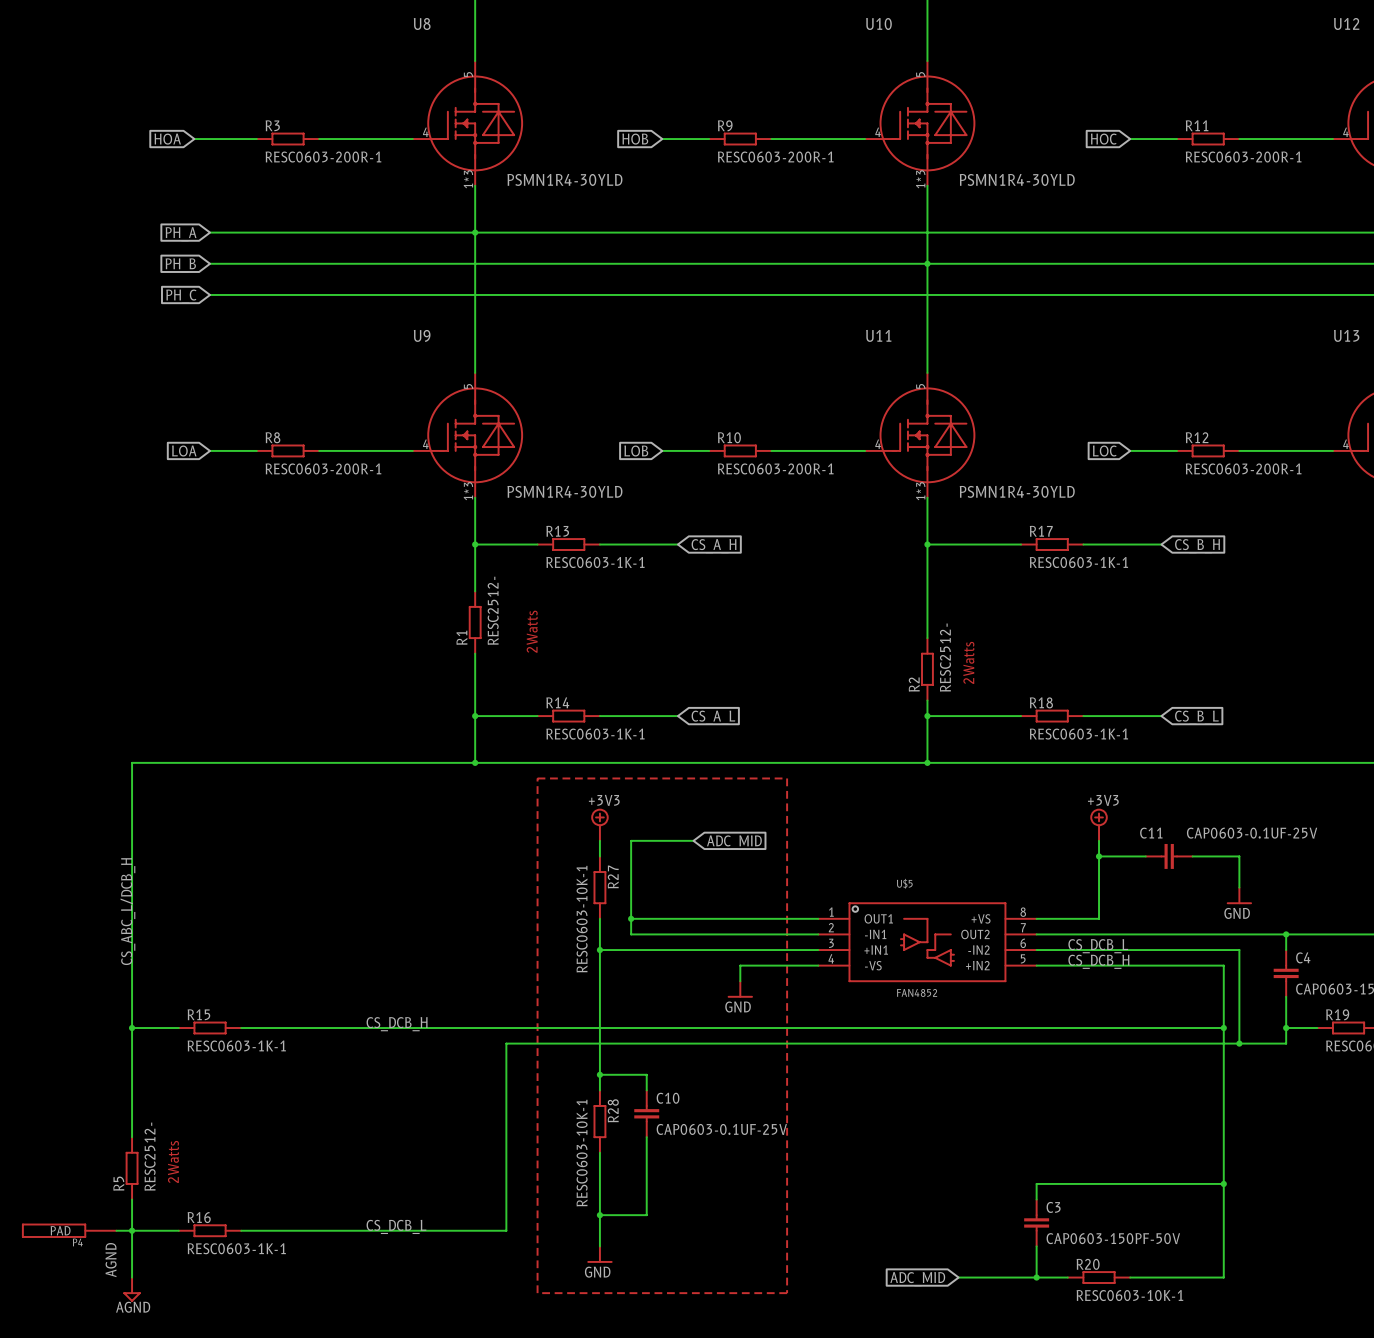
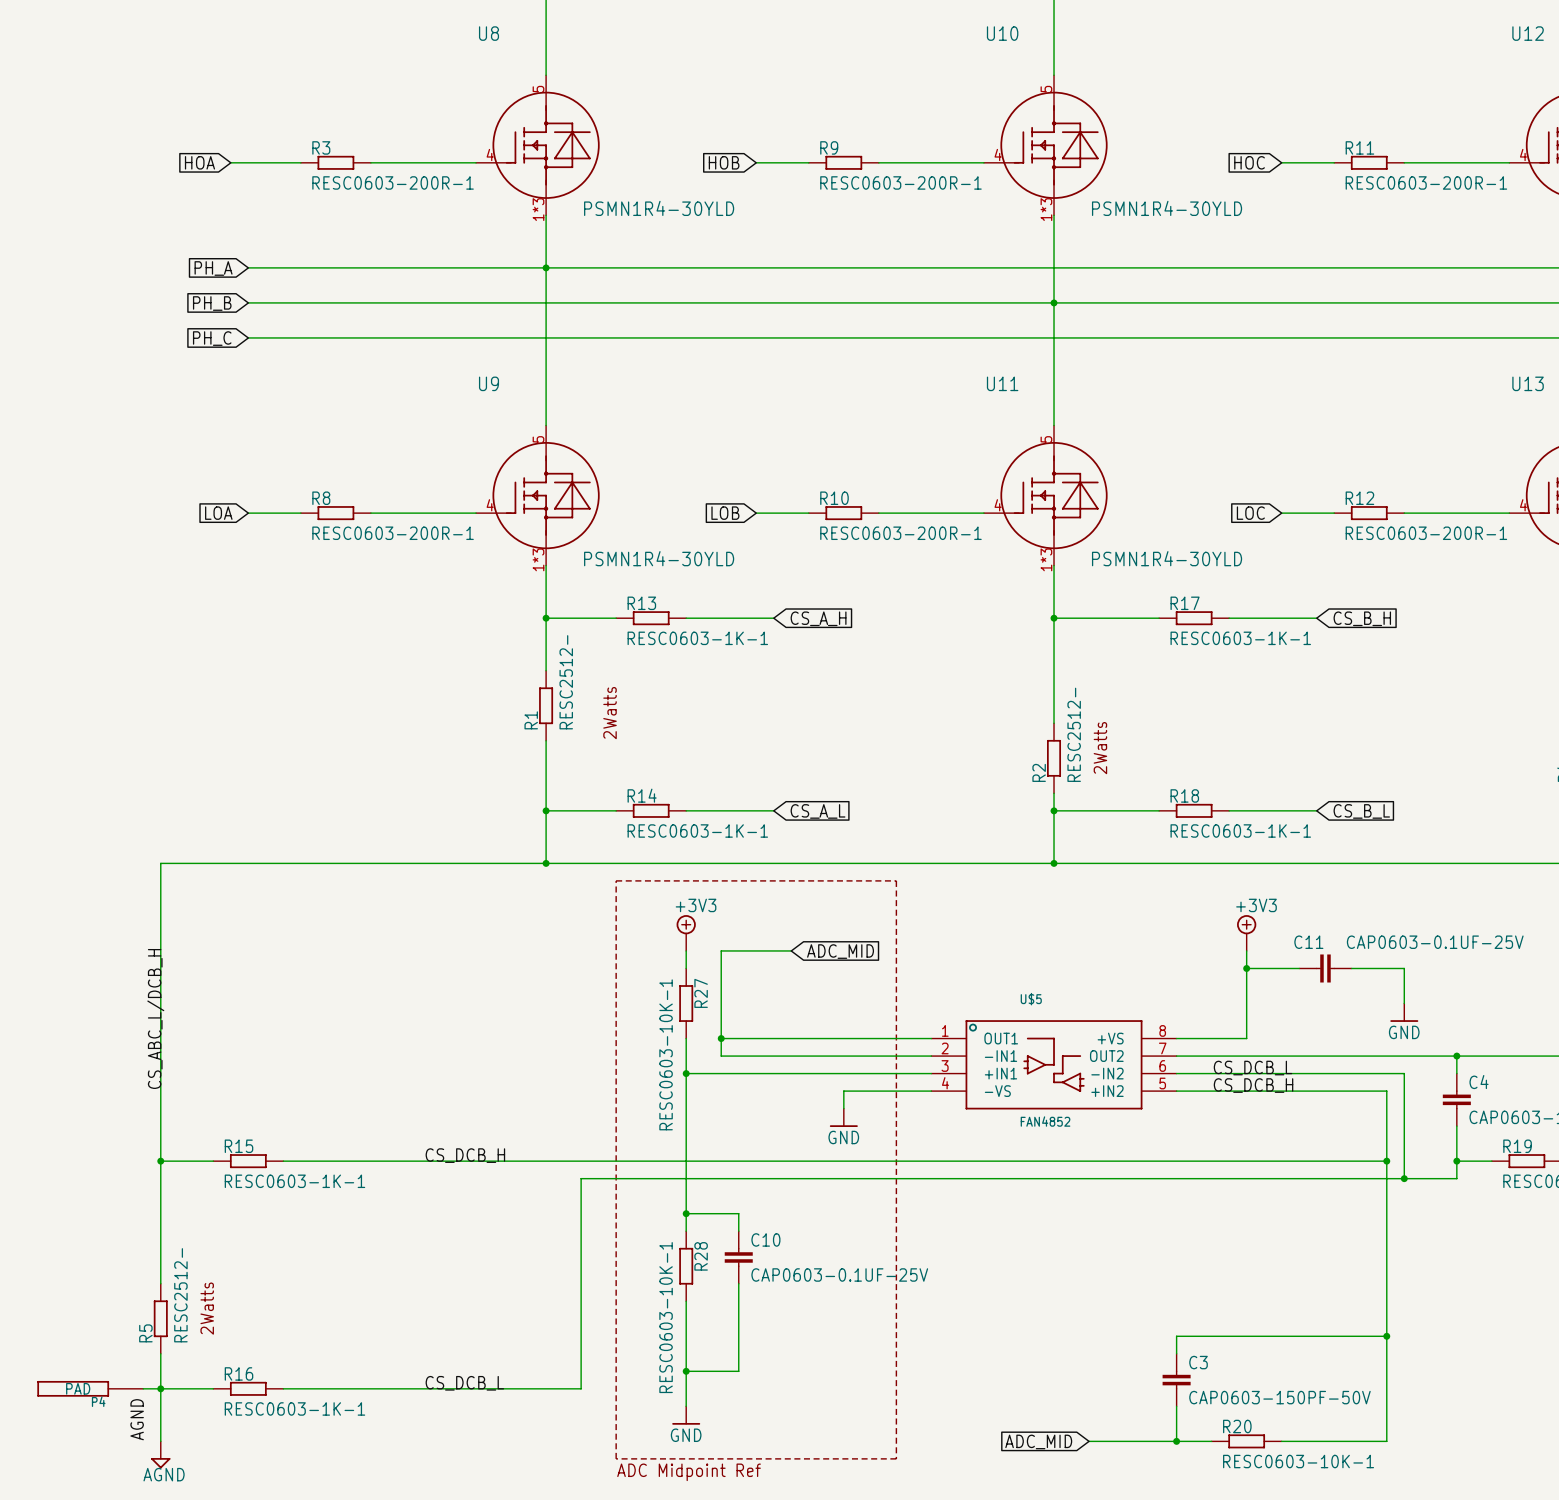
text: none -> ADC Midpoint Ref (689, 1472)

